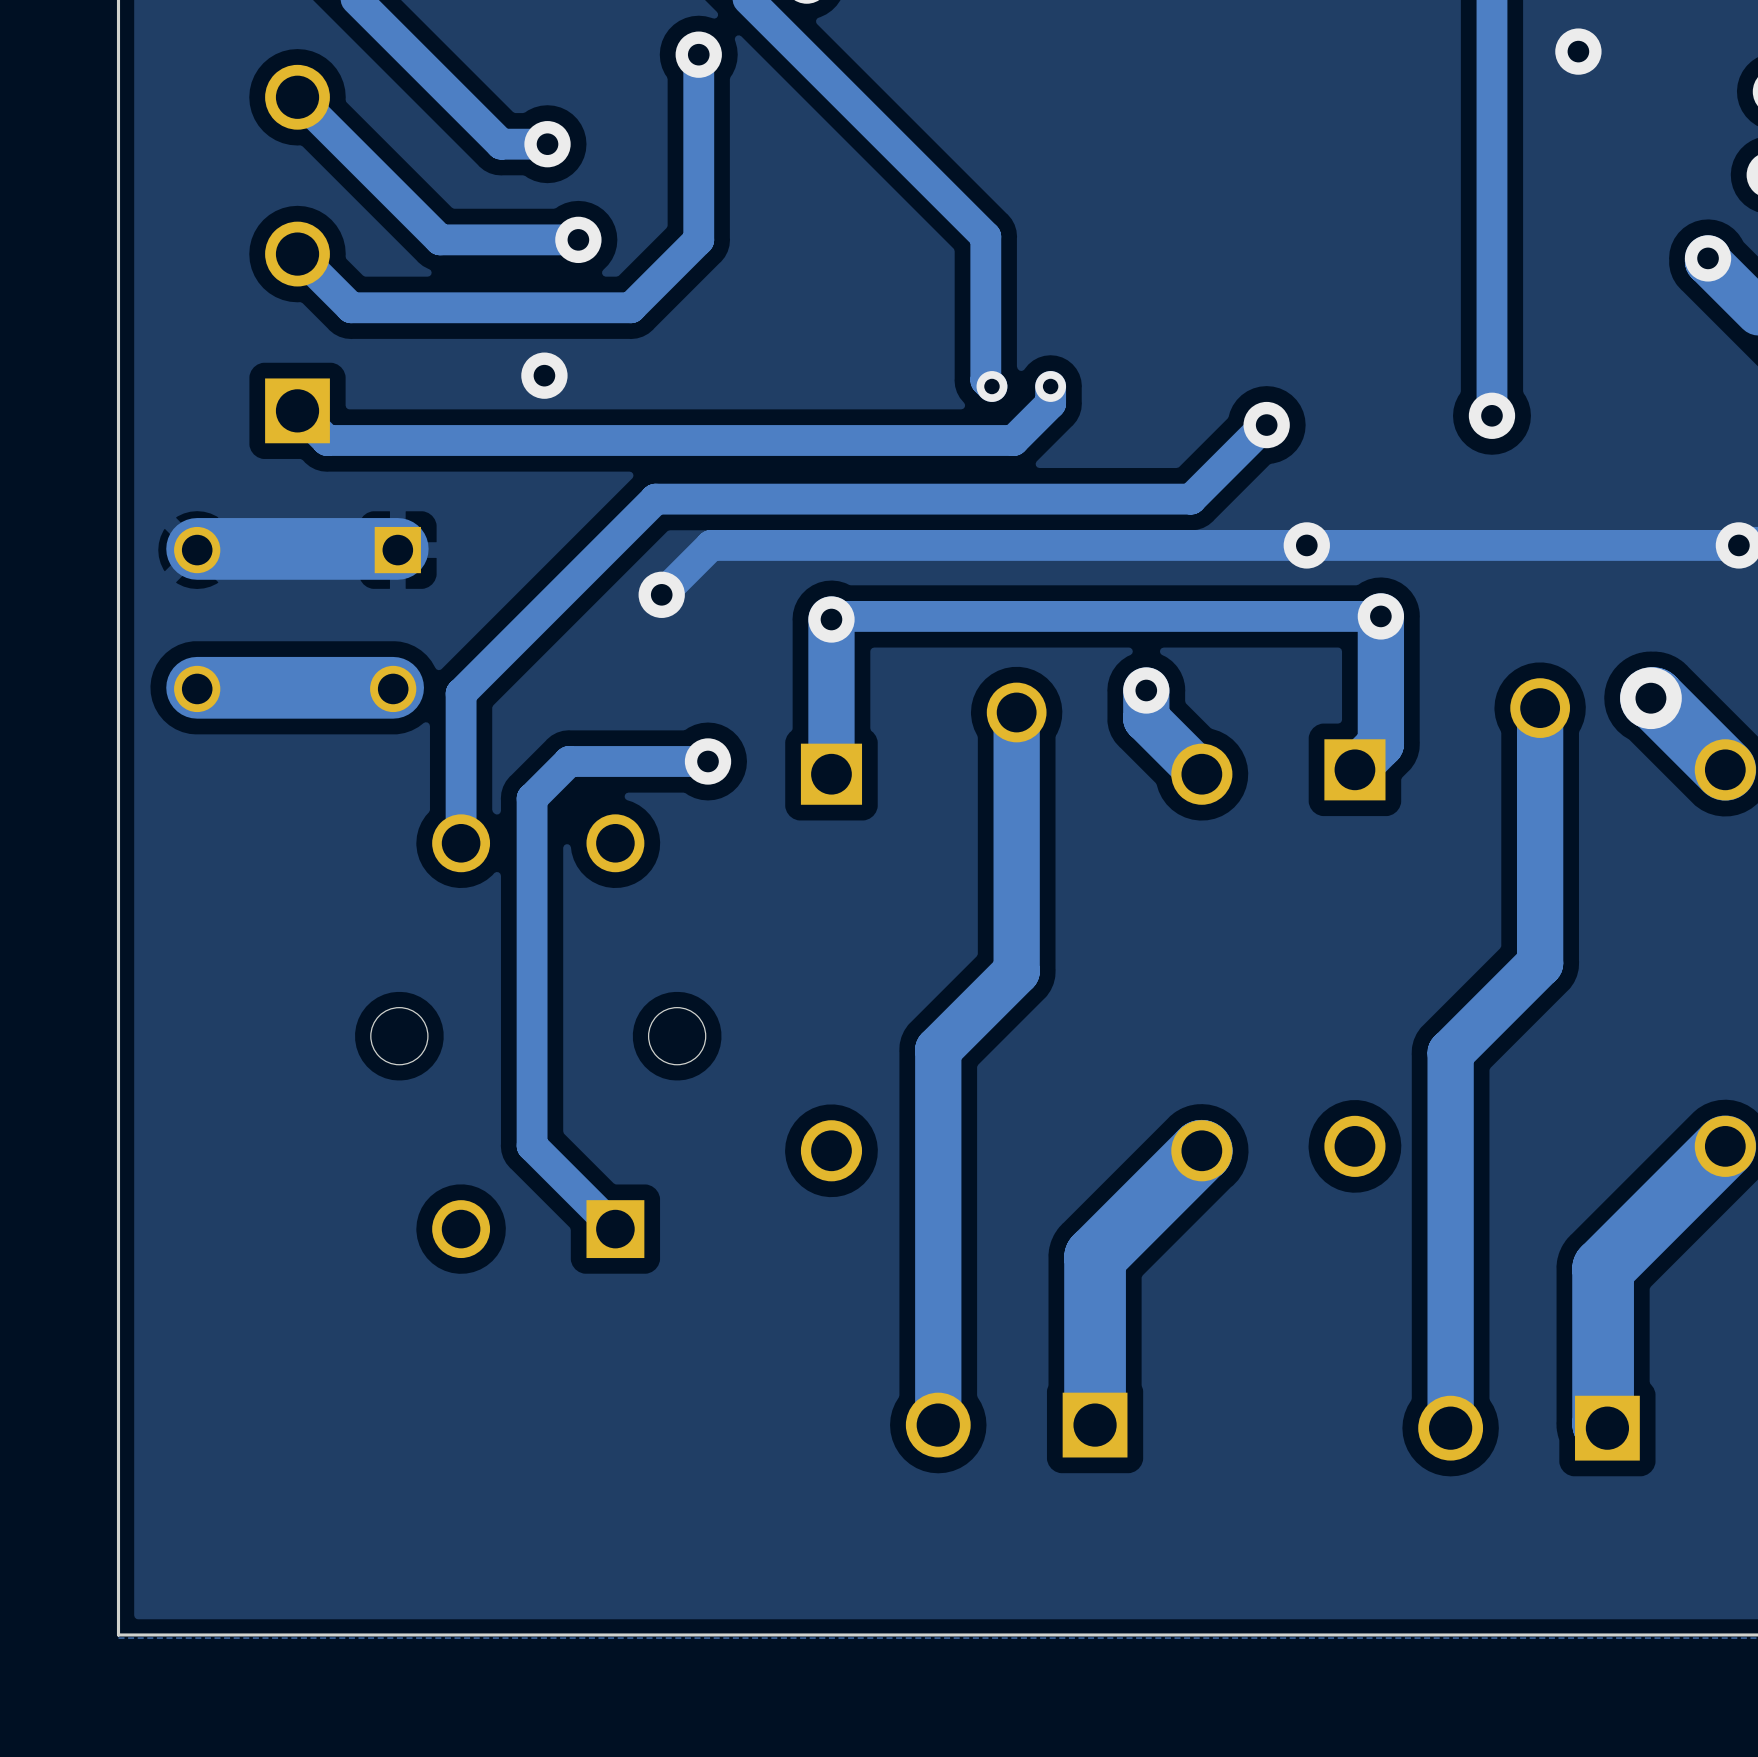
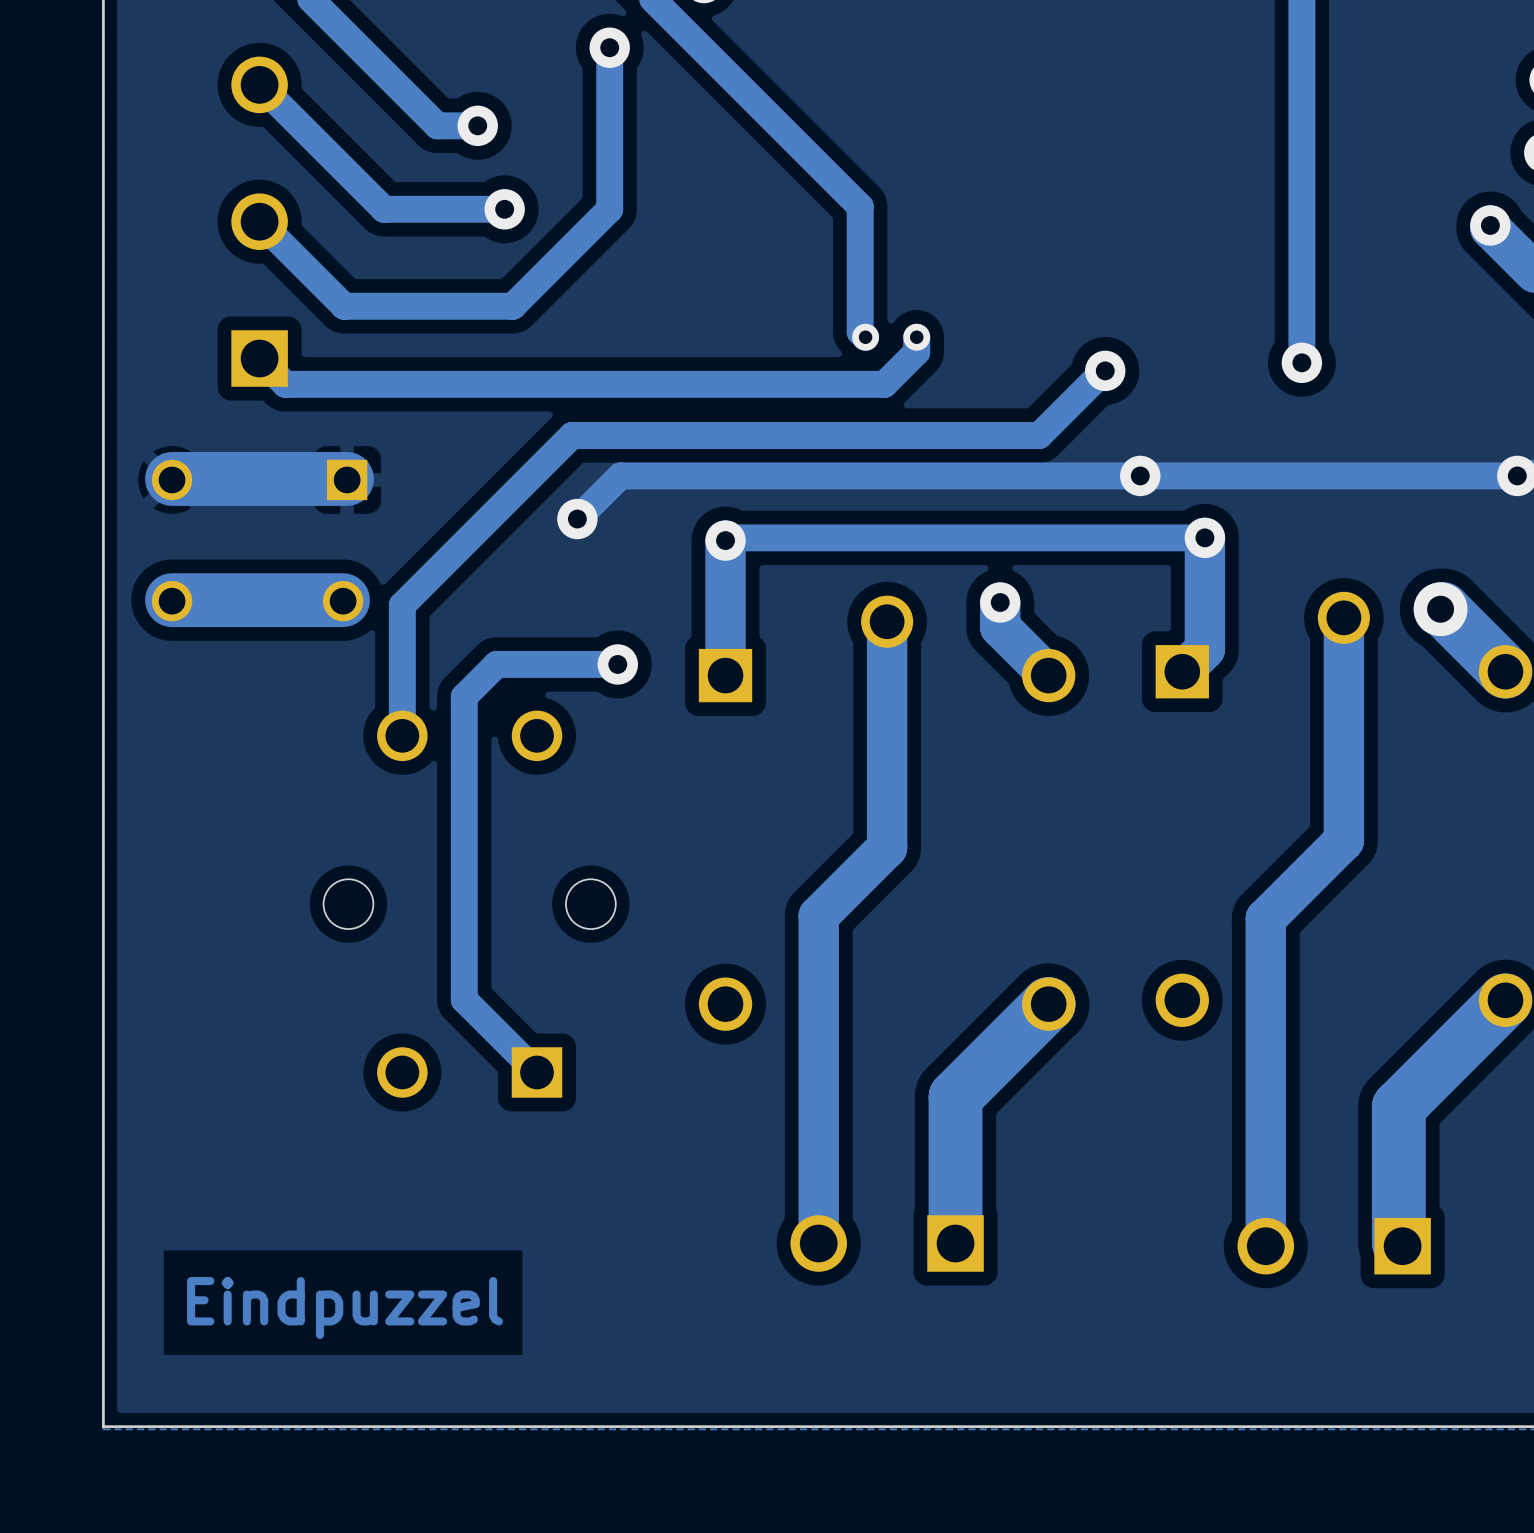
via: (1578, 51) -> none
track: (630, 307) (351, 307) -> (550, 268) (512, 306) (344, 306) (306, 268)
via: (544, 375) -> none
text: none -> Eindpuzzel (345, 1307)

